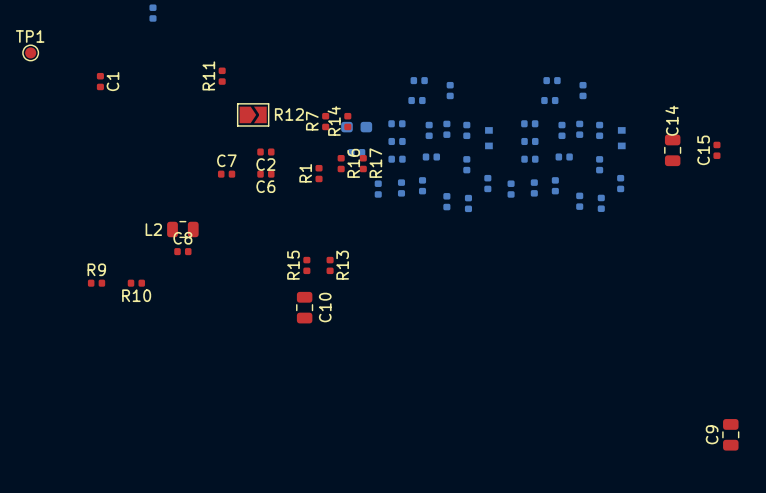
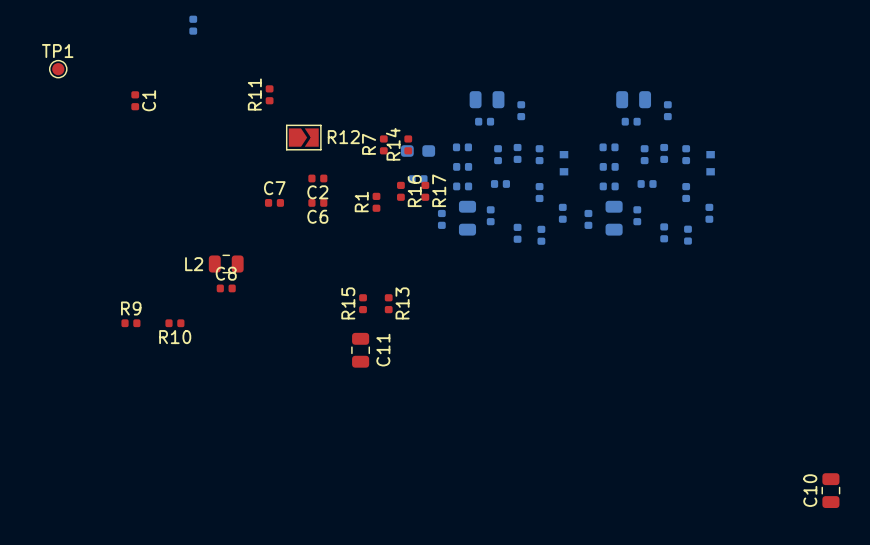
part footprint: [410, 77, 428, 85] -> [469, 91, 505, 109]
part footprint: [543, 77, 561, 85] -> [616, 91, 652, 109]
C14: (672, 150) -> none
C15: (716, 150) -> none
part footprint: [397, 179, 406, 197] -> [458, 200, 477, 236]
part footprint: [530, 179, 538, 197] -> [605, 200, 623, 236]
C10 name: C10 (325, 307) -> C11 (383, 350)
C9 name: C9 (712, 434) -> C10 (810, 490)

